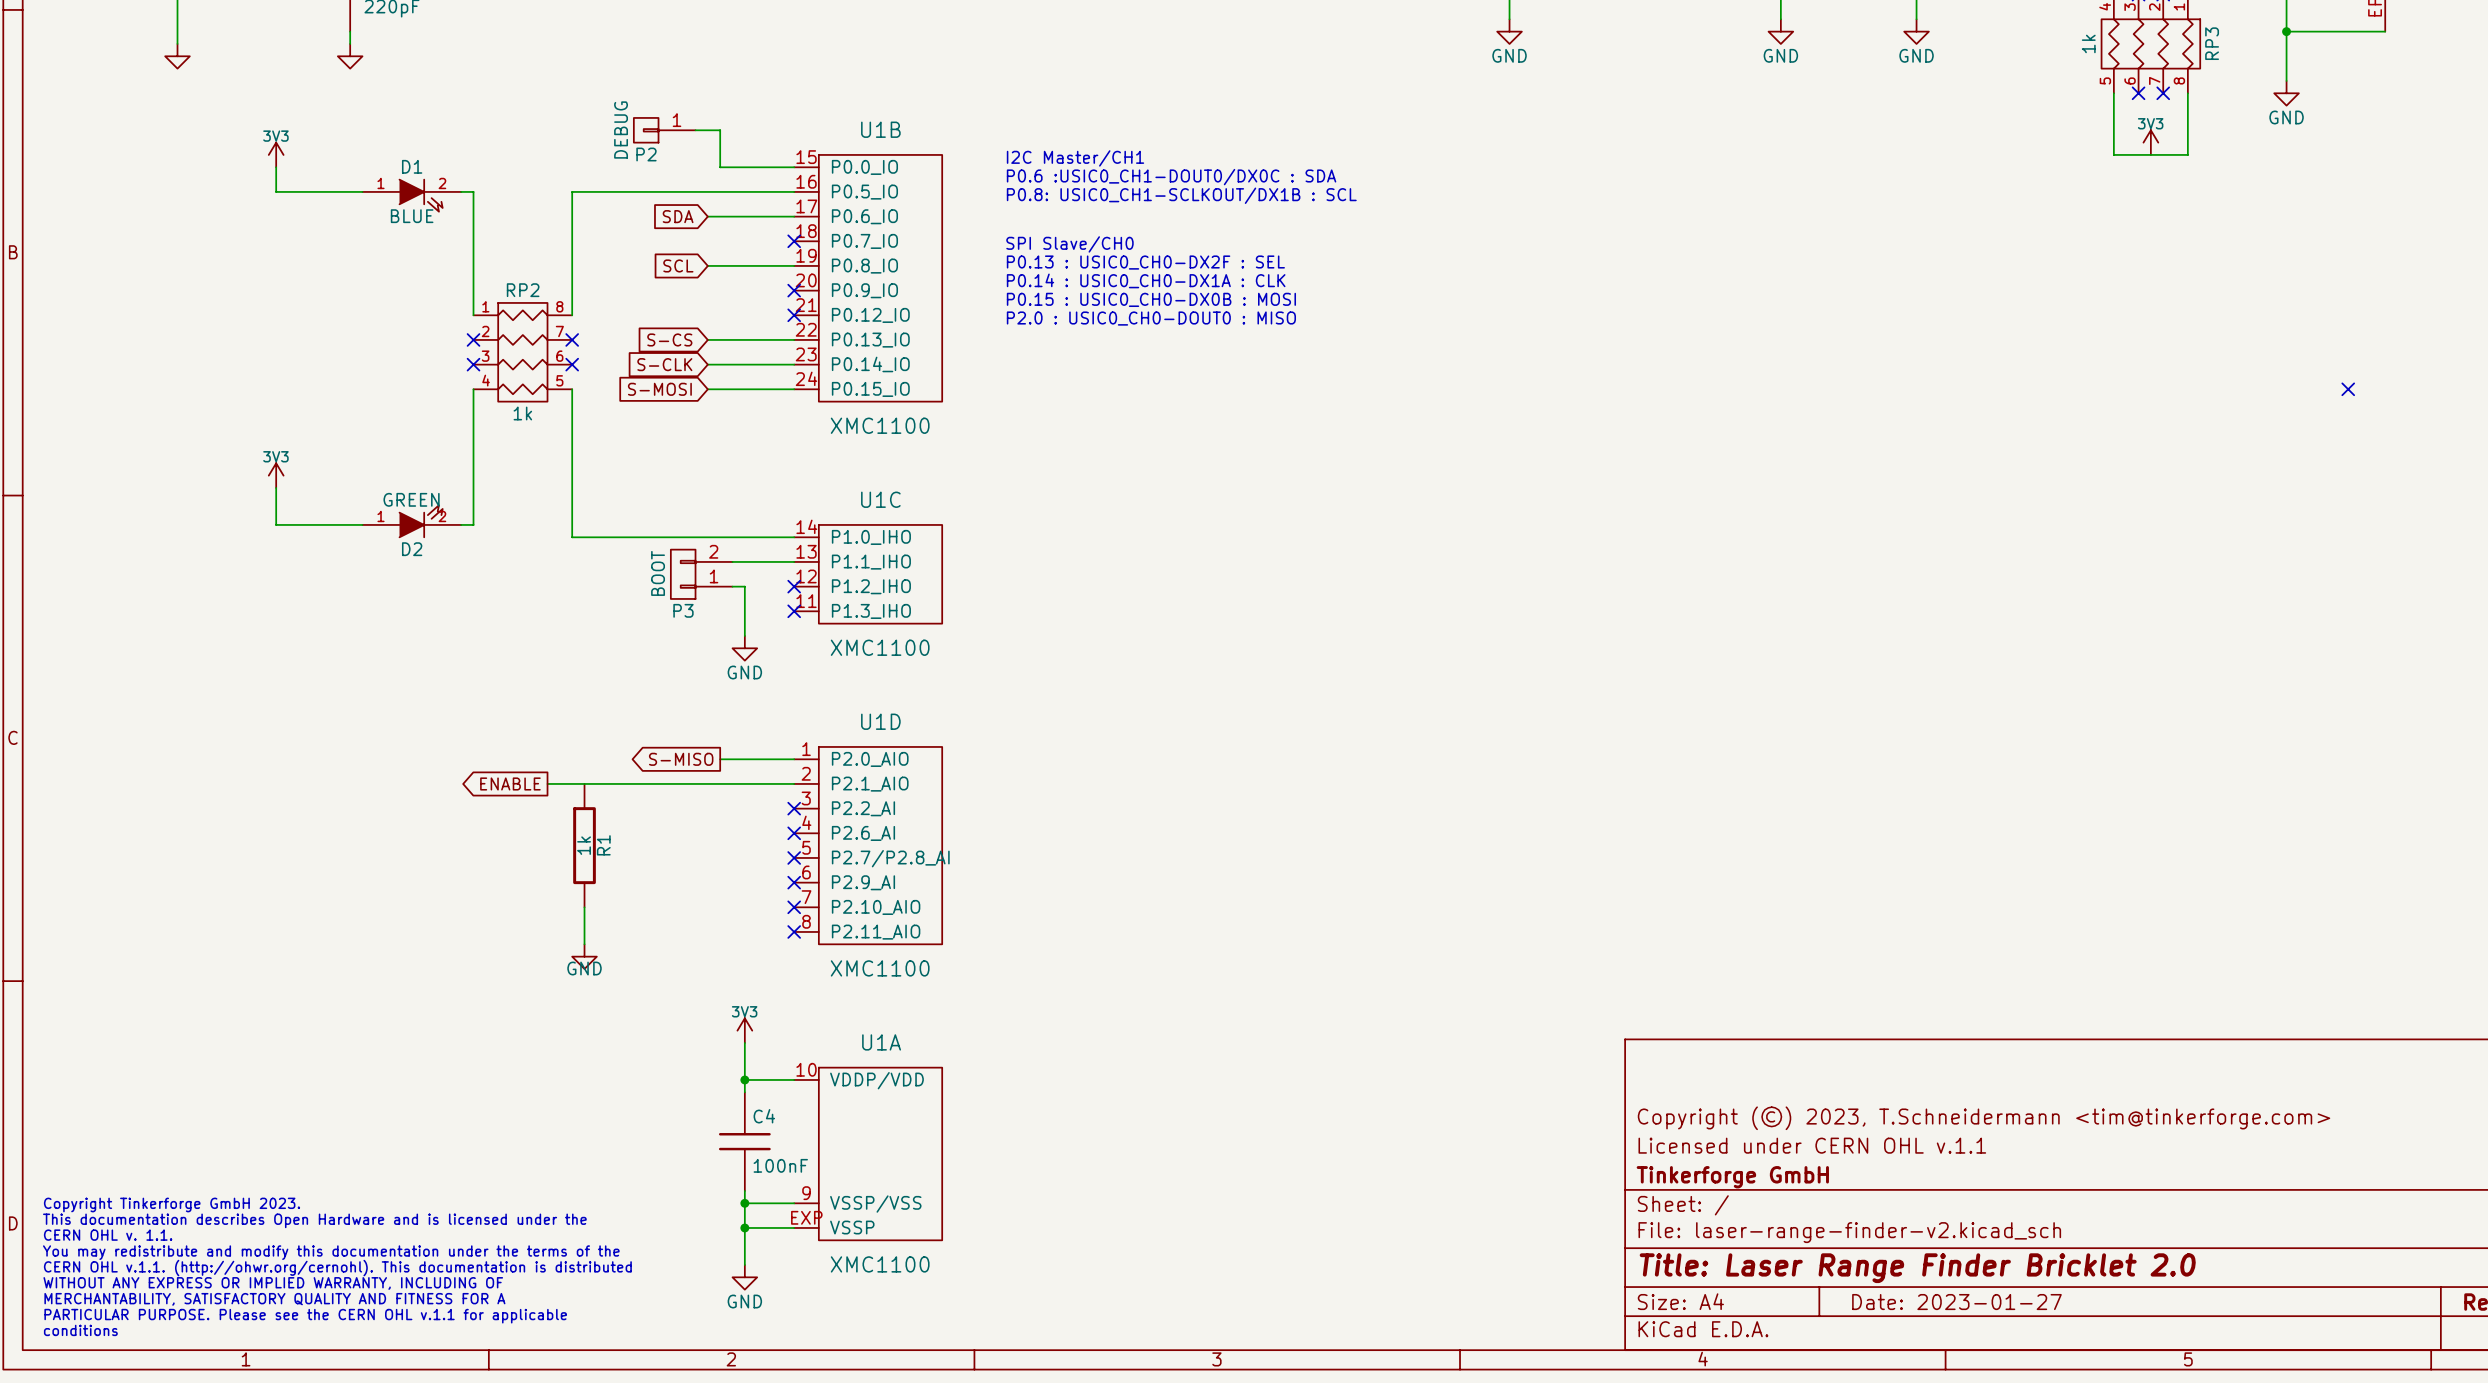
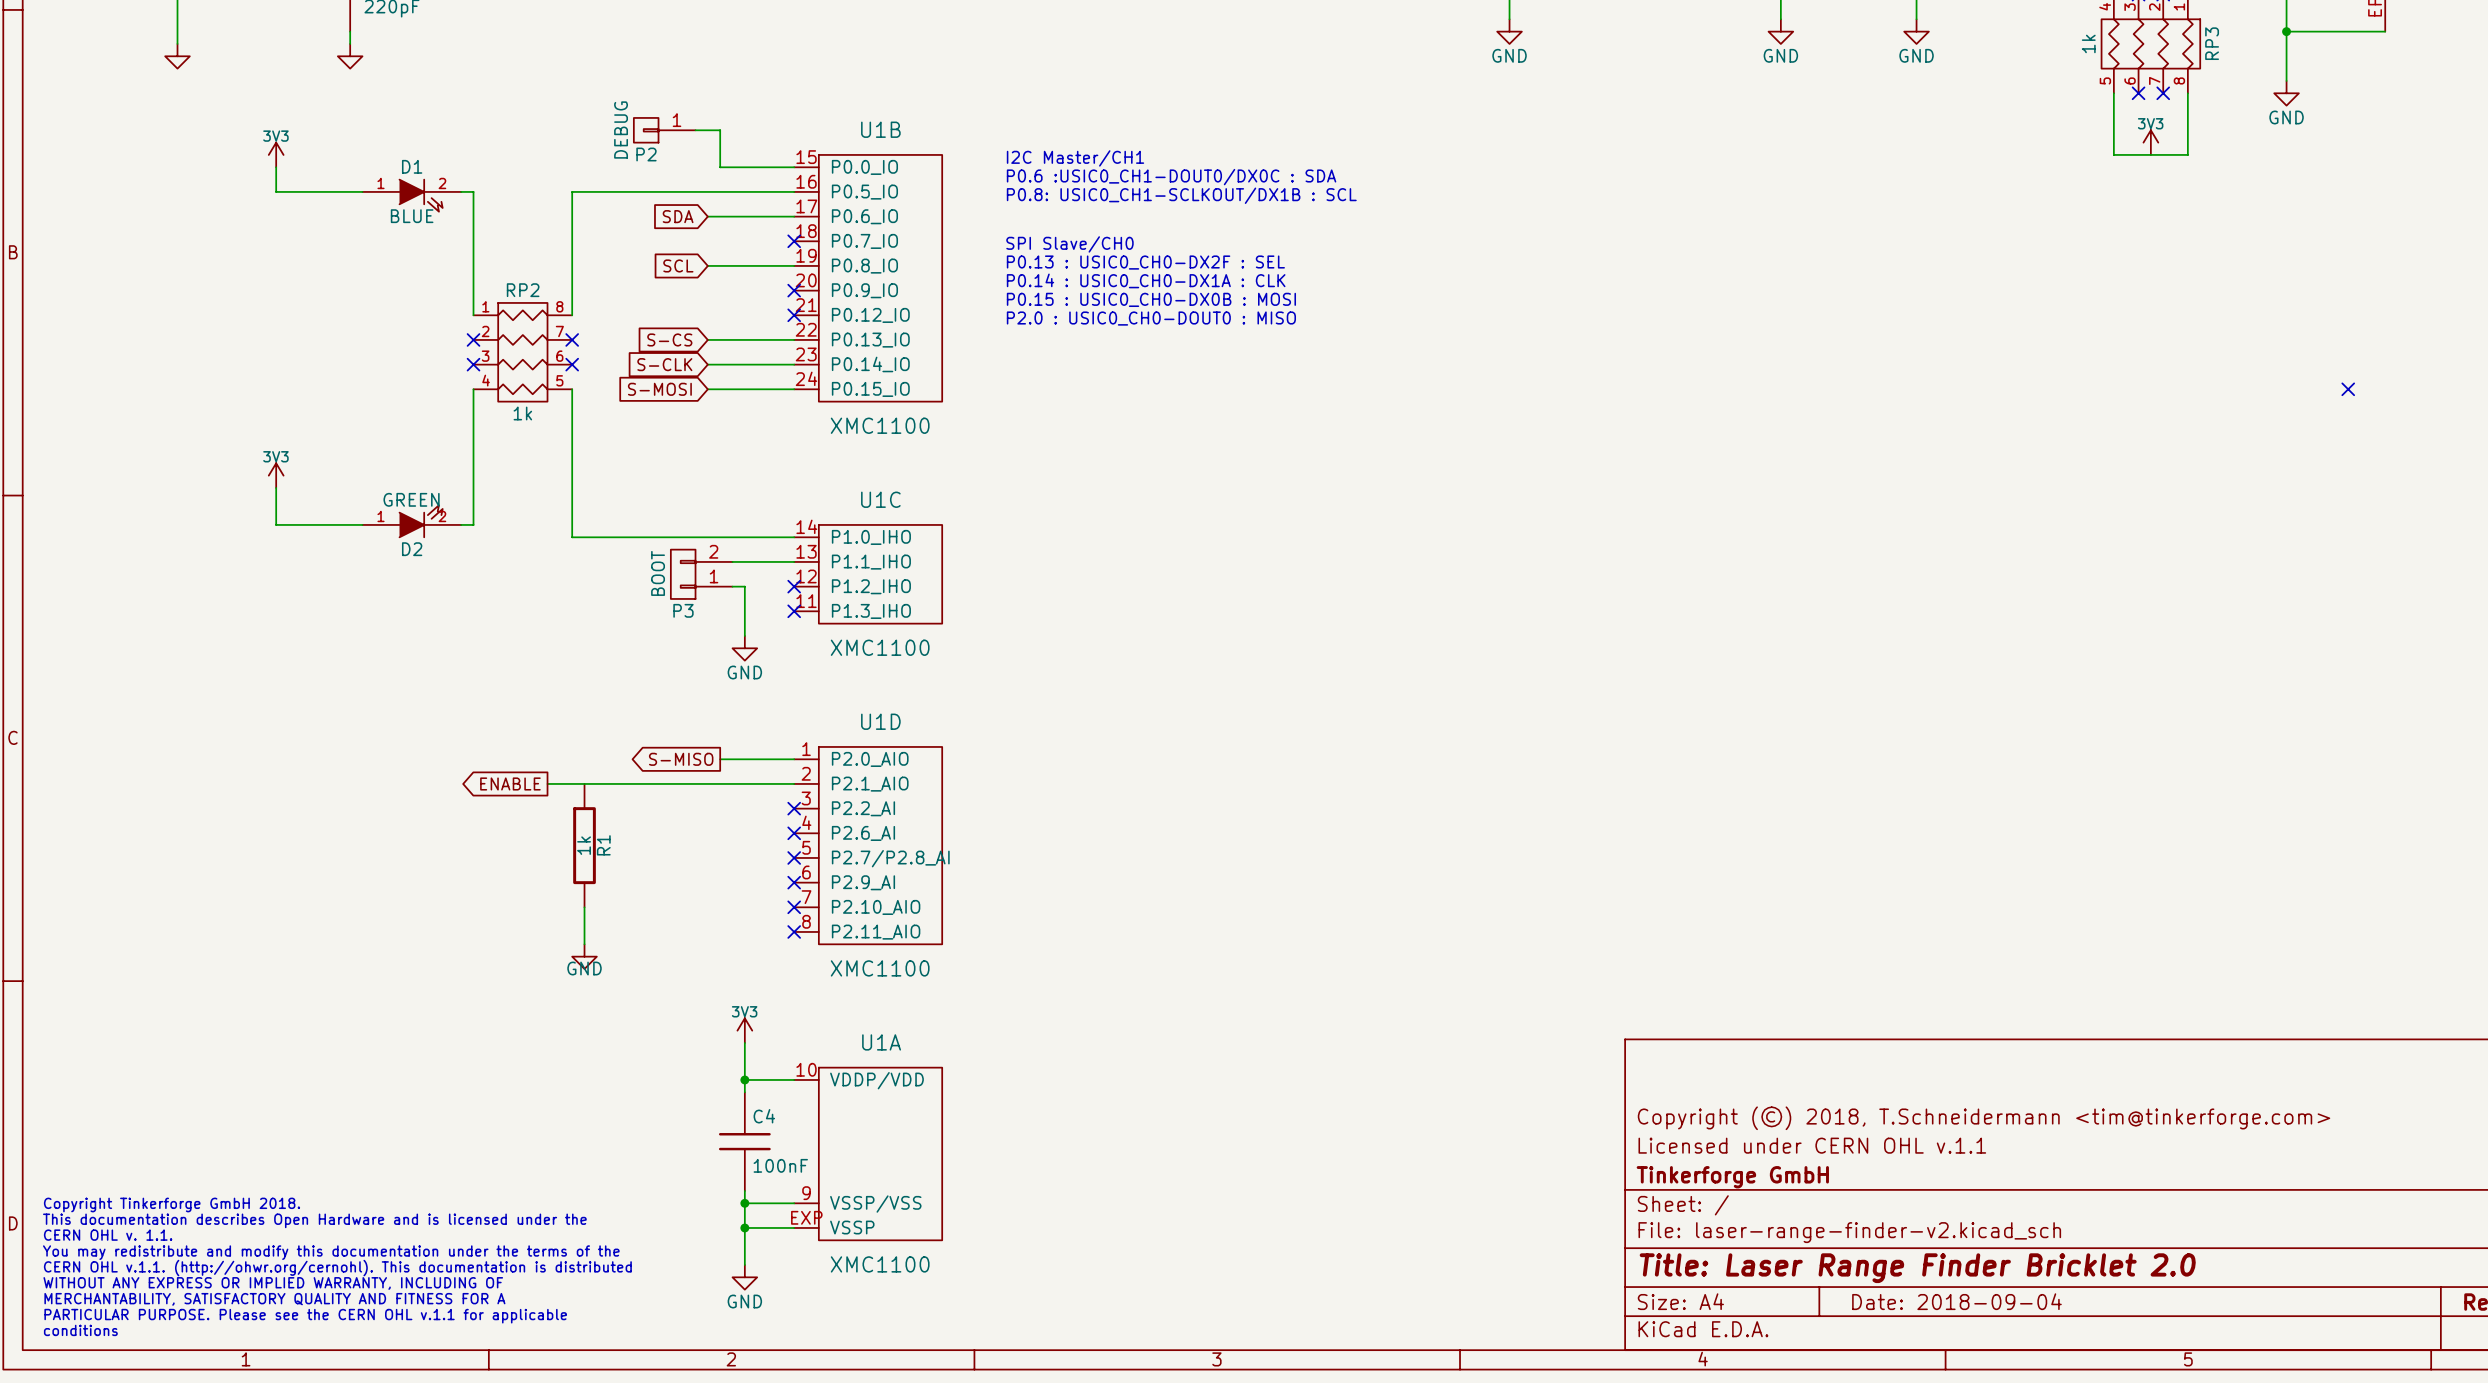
title block: Copyright (©) 2023, T.Schneidermann <tim@tinkerforge.com> (1984, 1118) -> Copyright (©) 2018, T.Schneidermann <tim@tinkerforge.com> (1984, 1118)
text: Copyright Tinkerforge GmbH 2023. (172, 1204) -> Copyright Tinkerforge GmbH 2018. (172, 1204)
title block: Date: 2023-01-27 (1956, 1302) -> Date: 2018-09-04 (1956, 1301)

